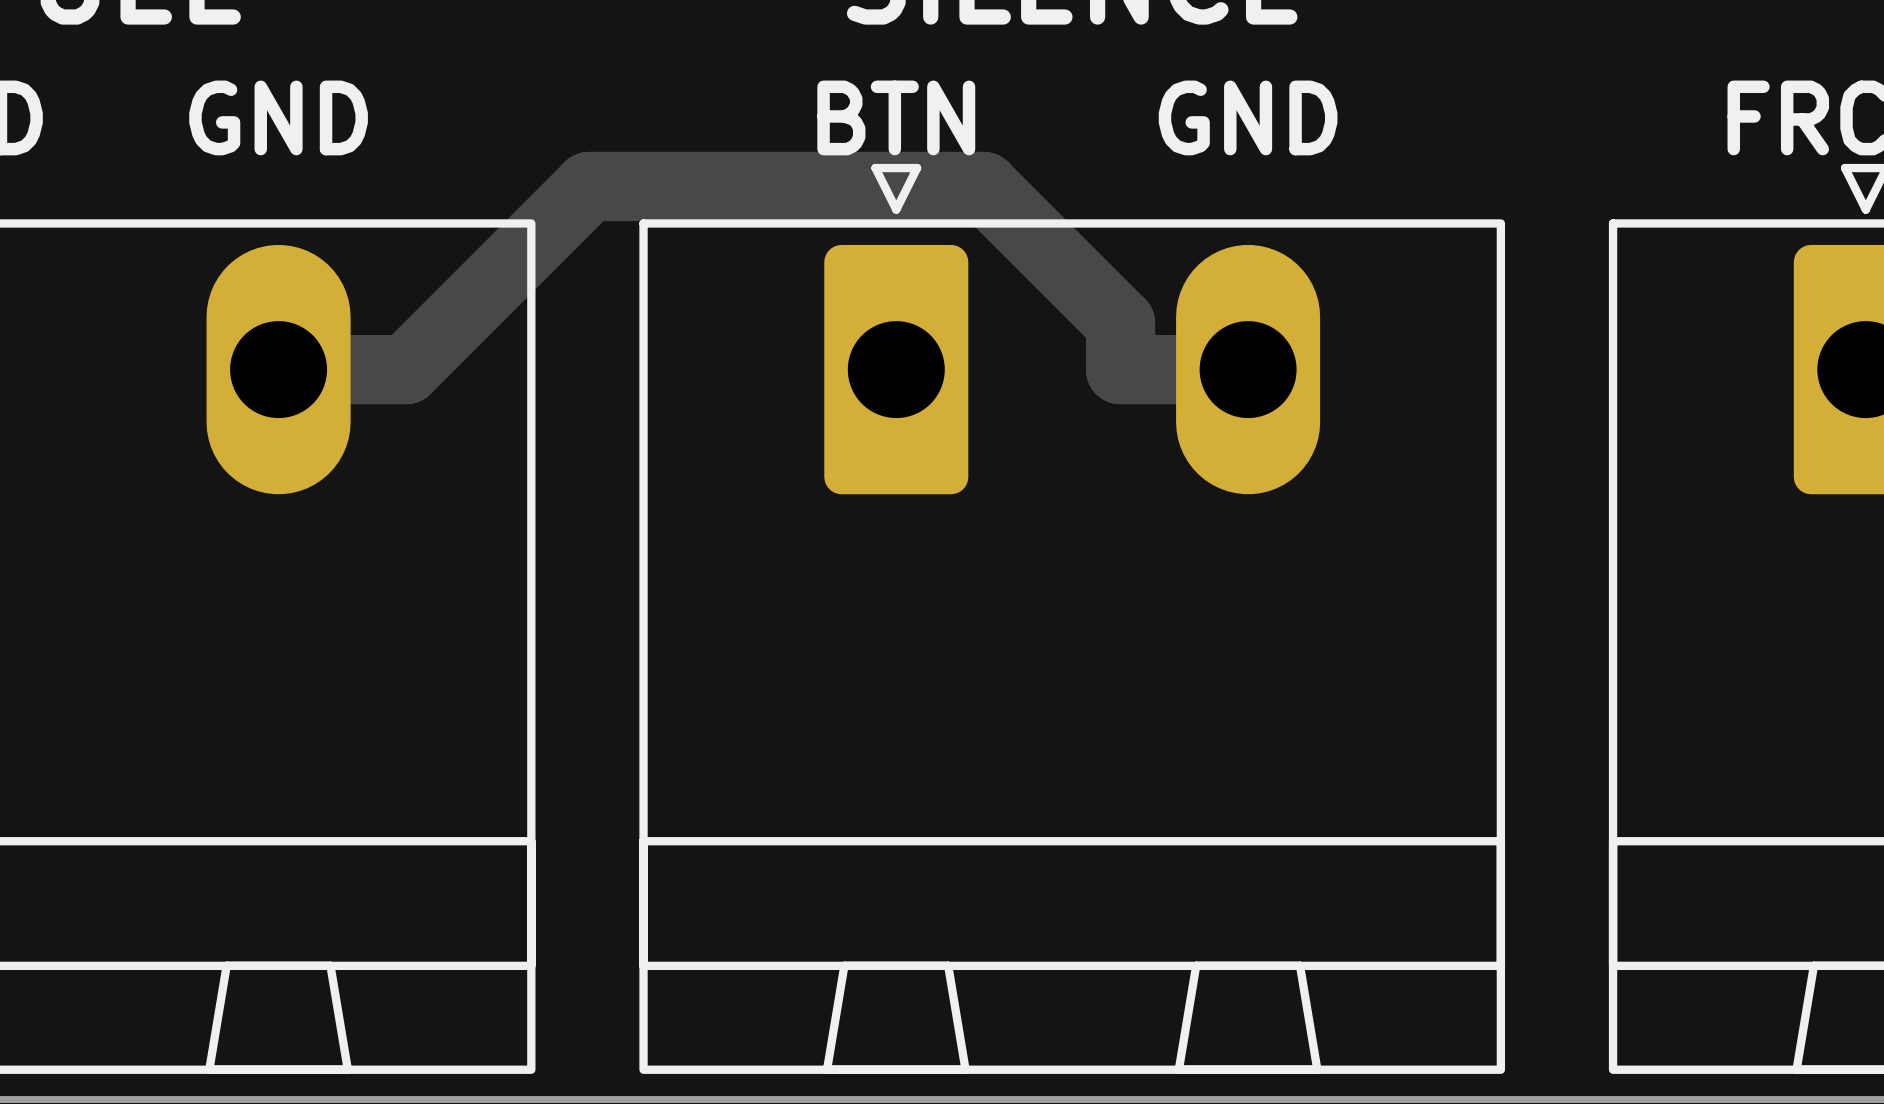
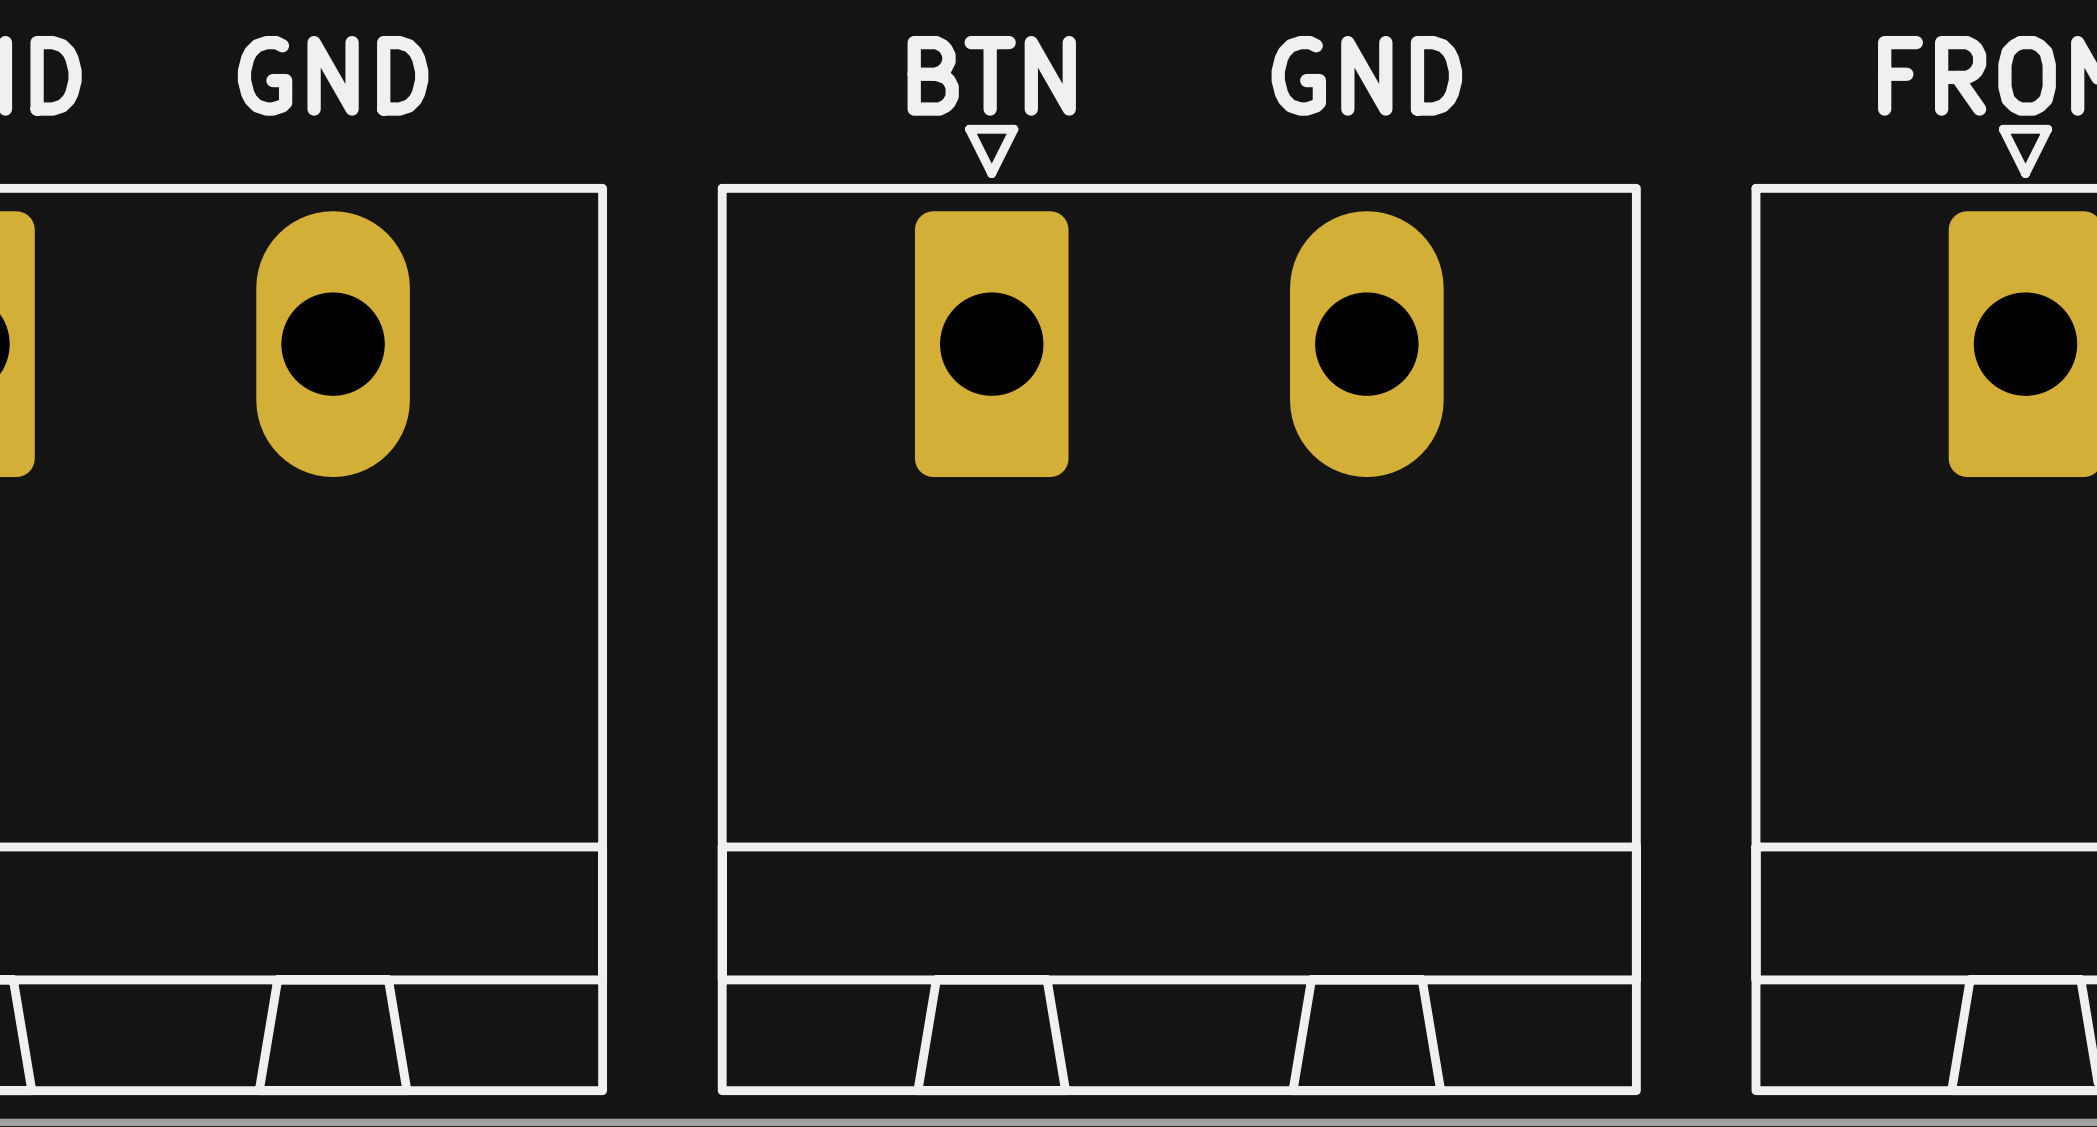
track: (278, 369) (406, 369) (589, 186) (983, 186) (1120, 323) (1120, 369) (1248, 369) -> none

